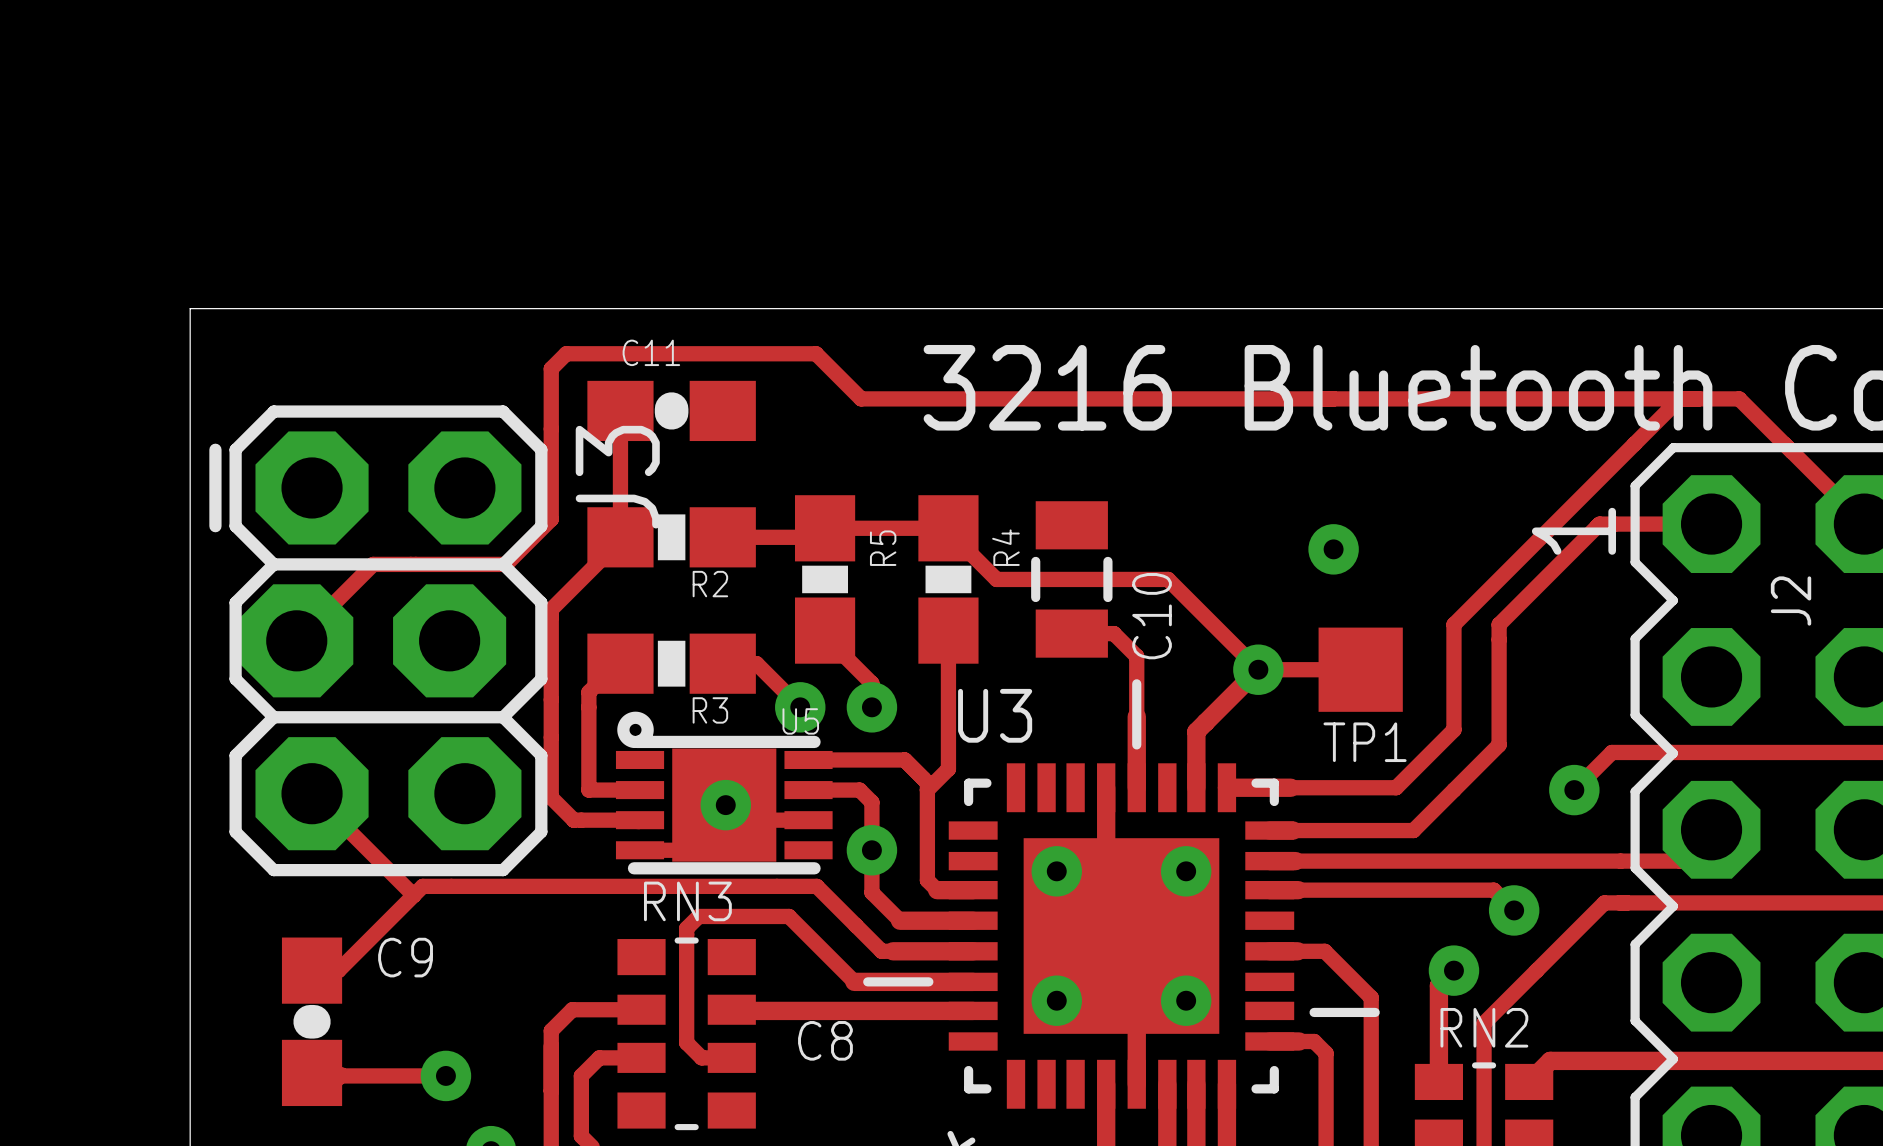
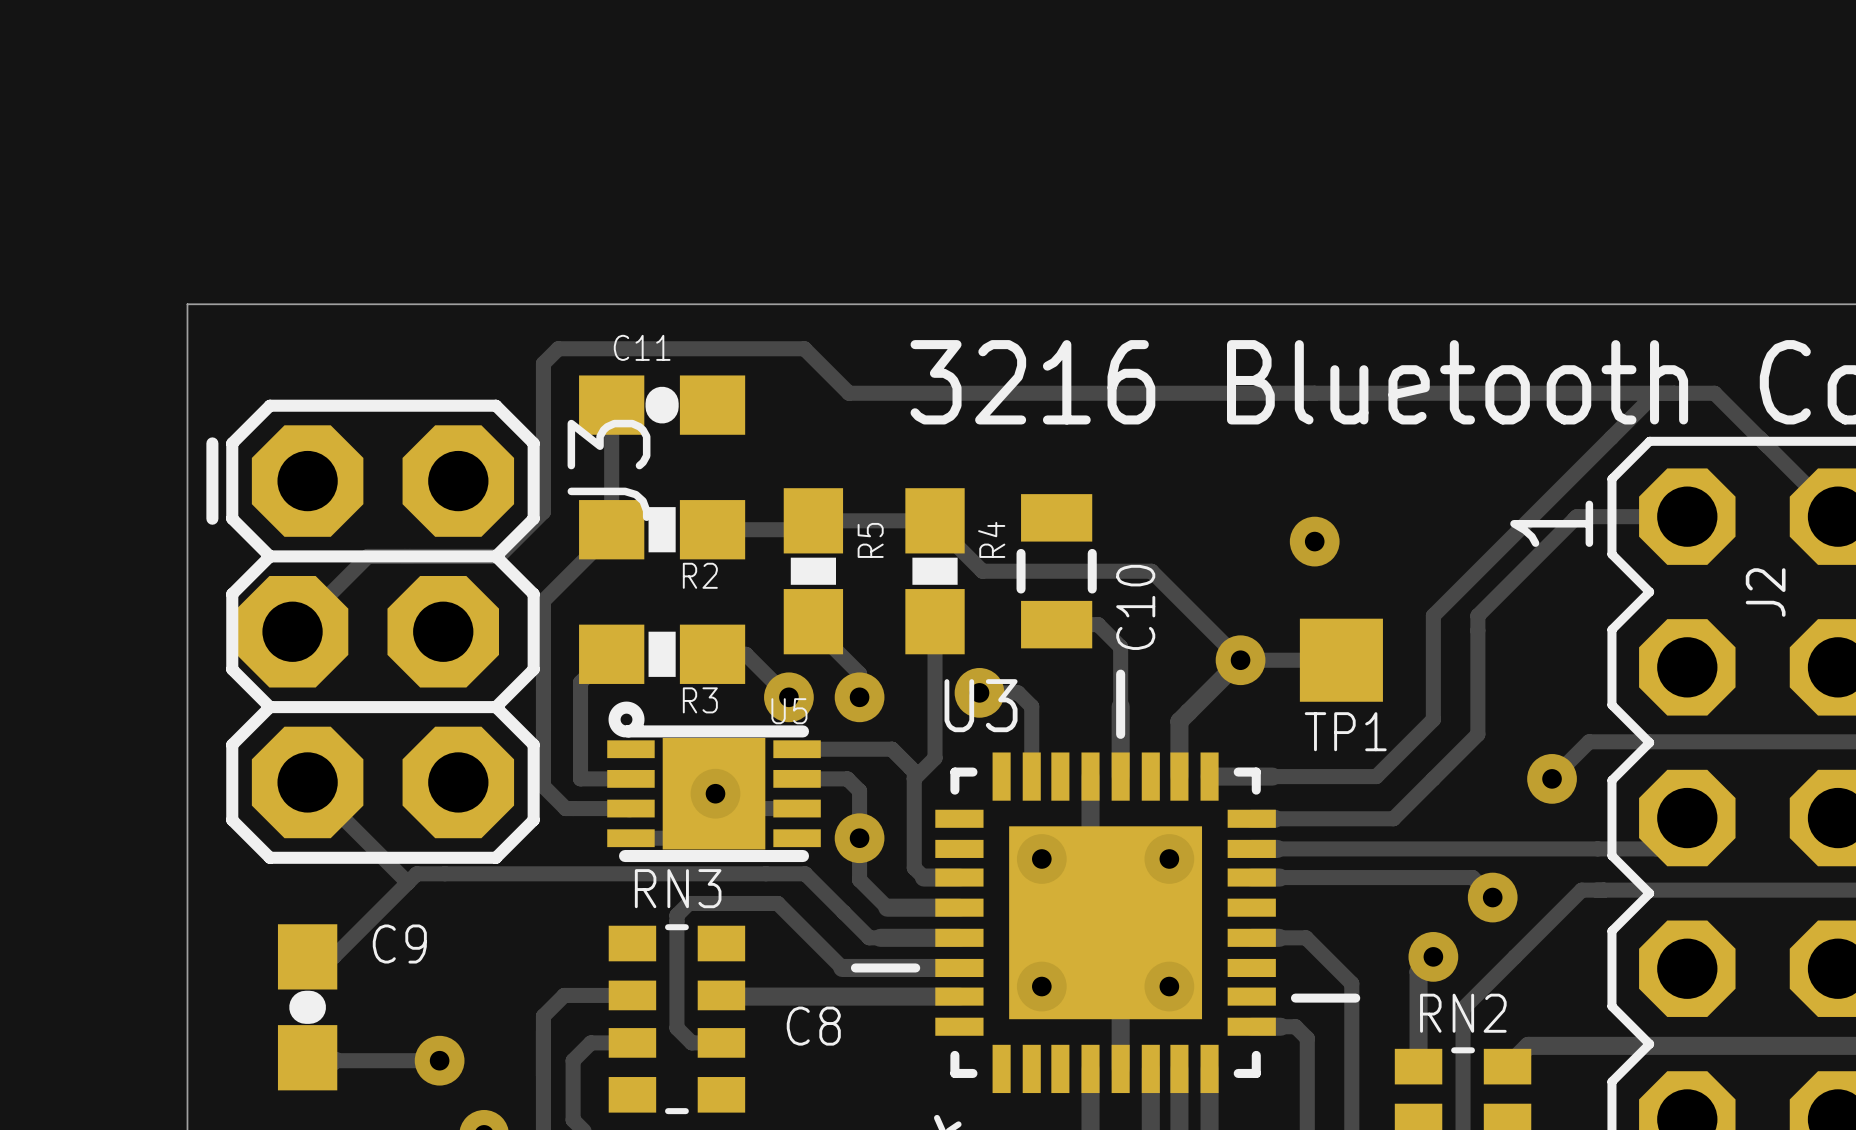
track: none -> (979, 692) (1018, 692) (1031, 706) (1031, 776)
via: none -> (979, 692)

